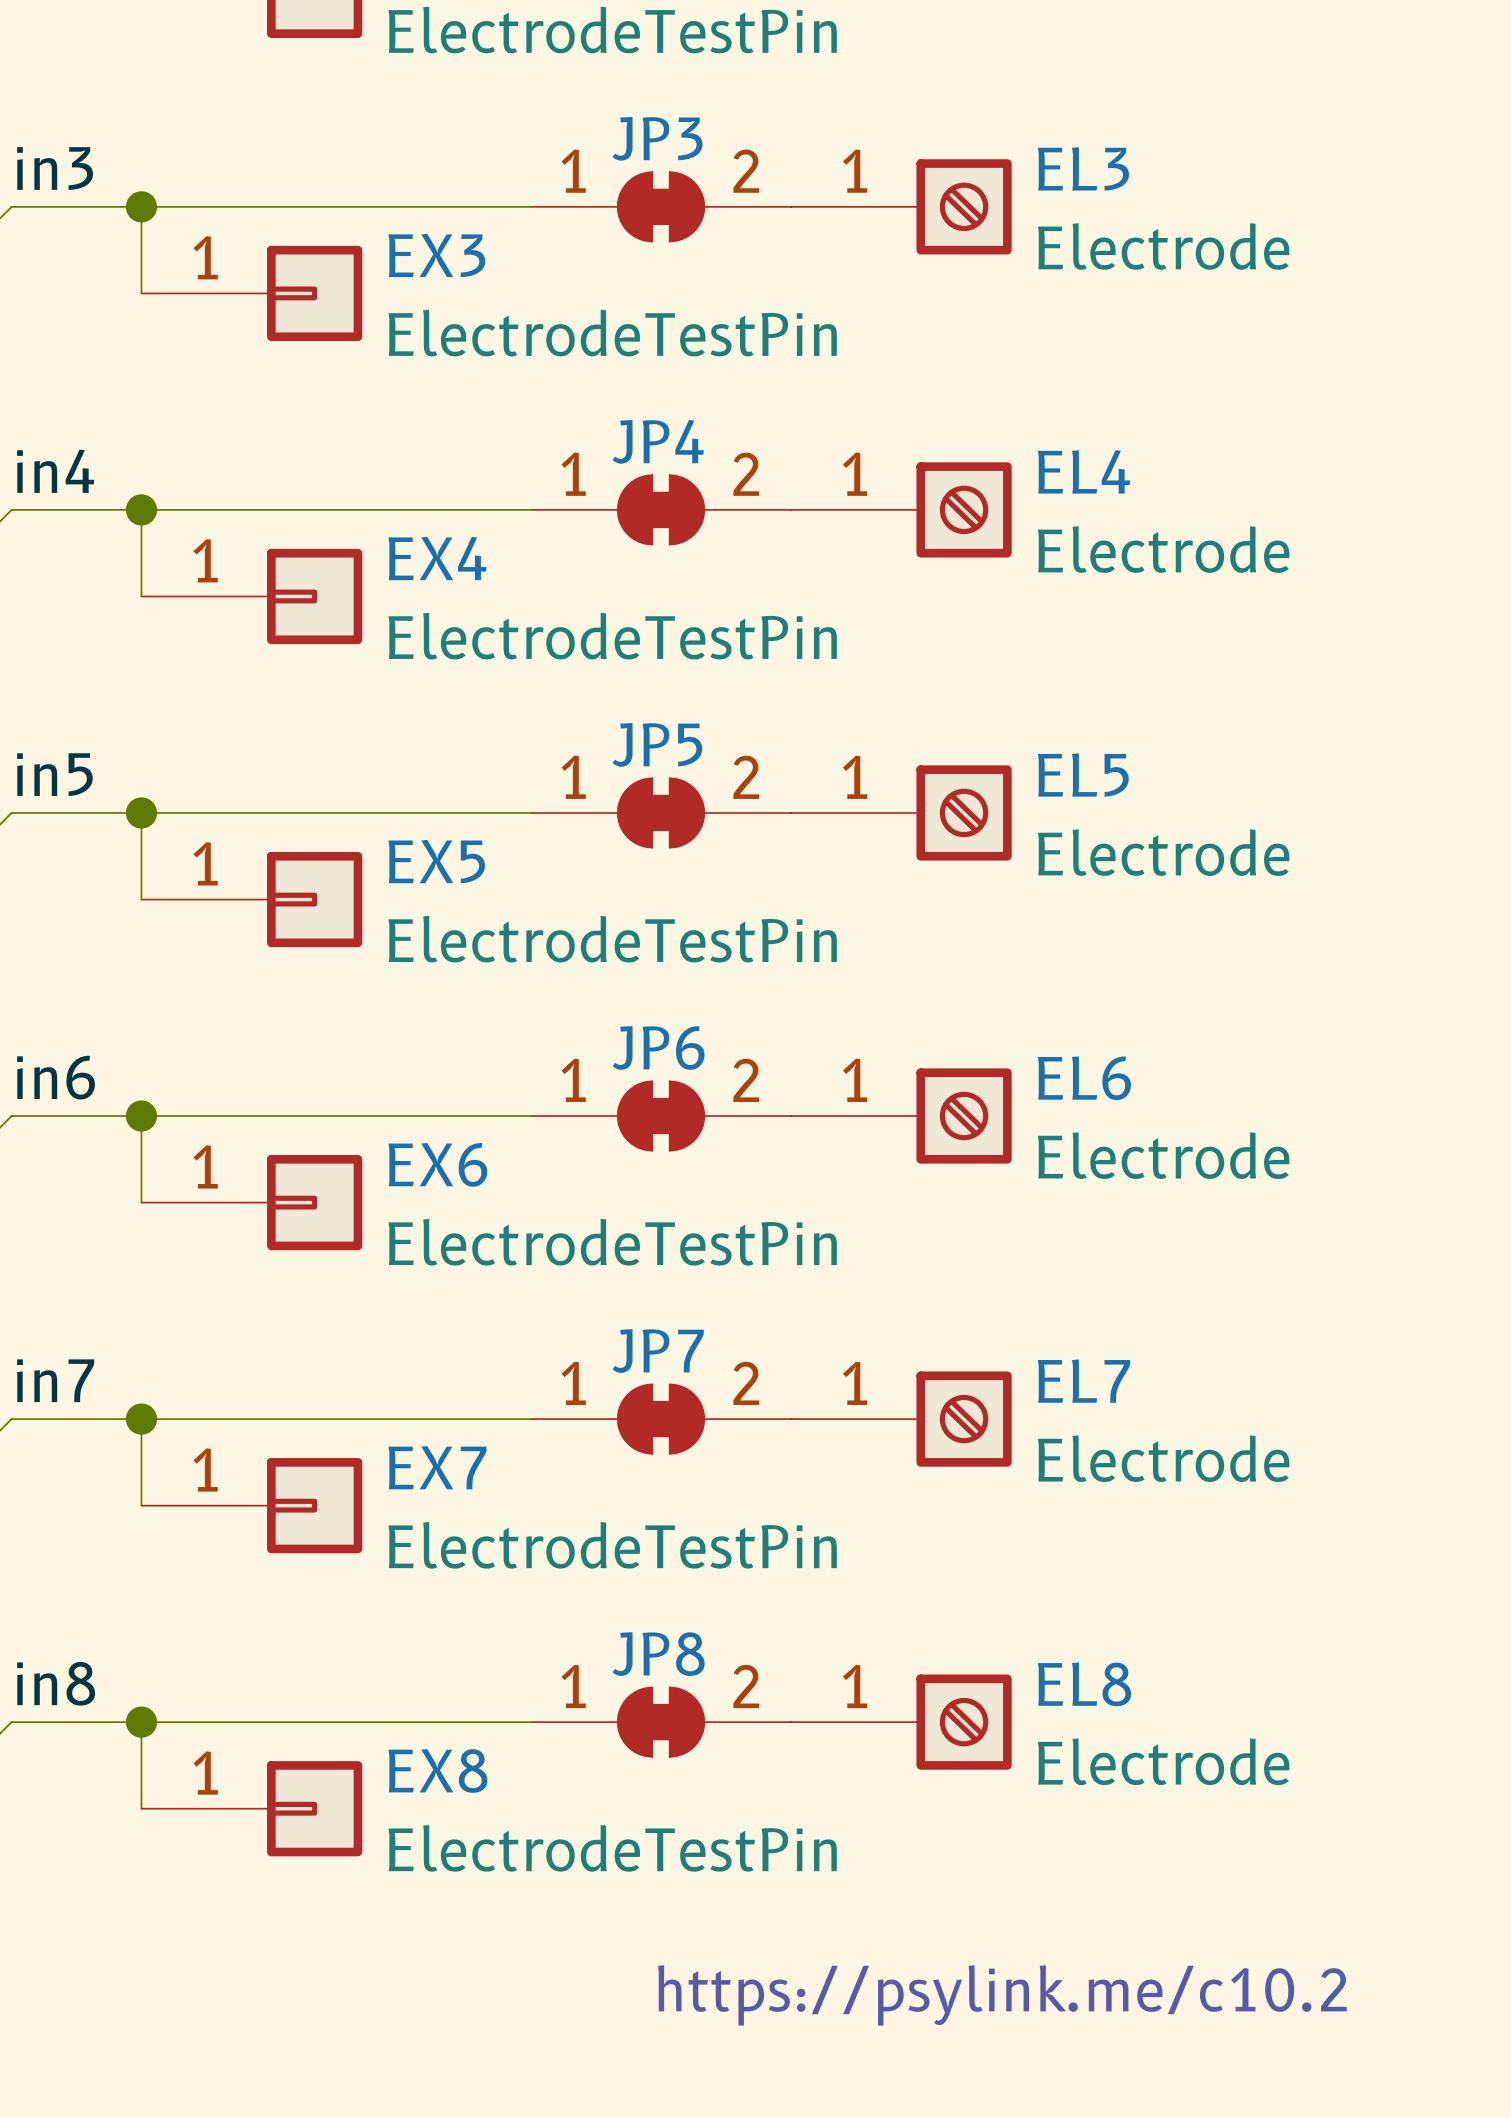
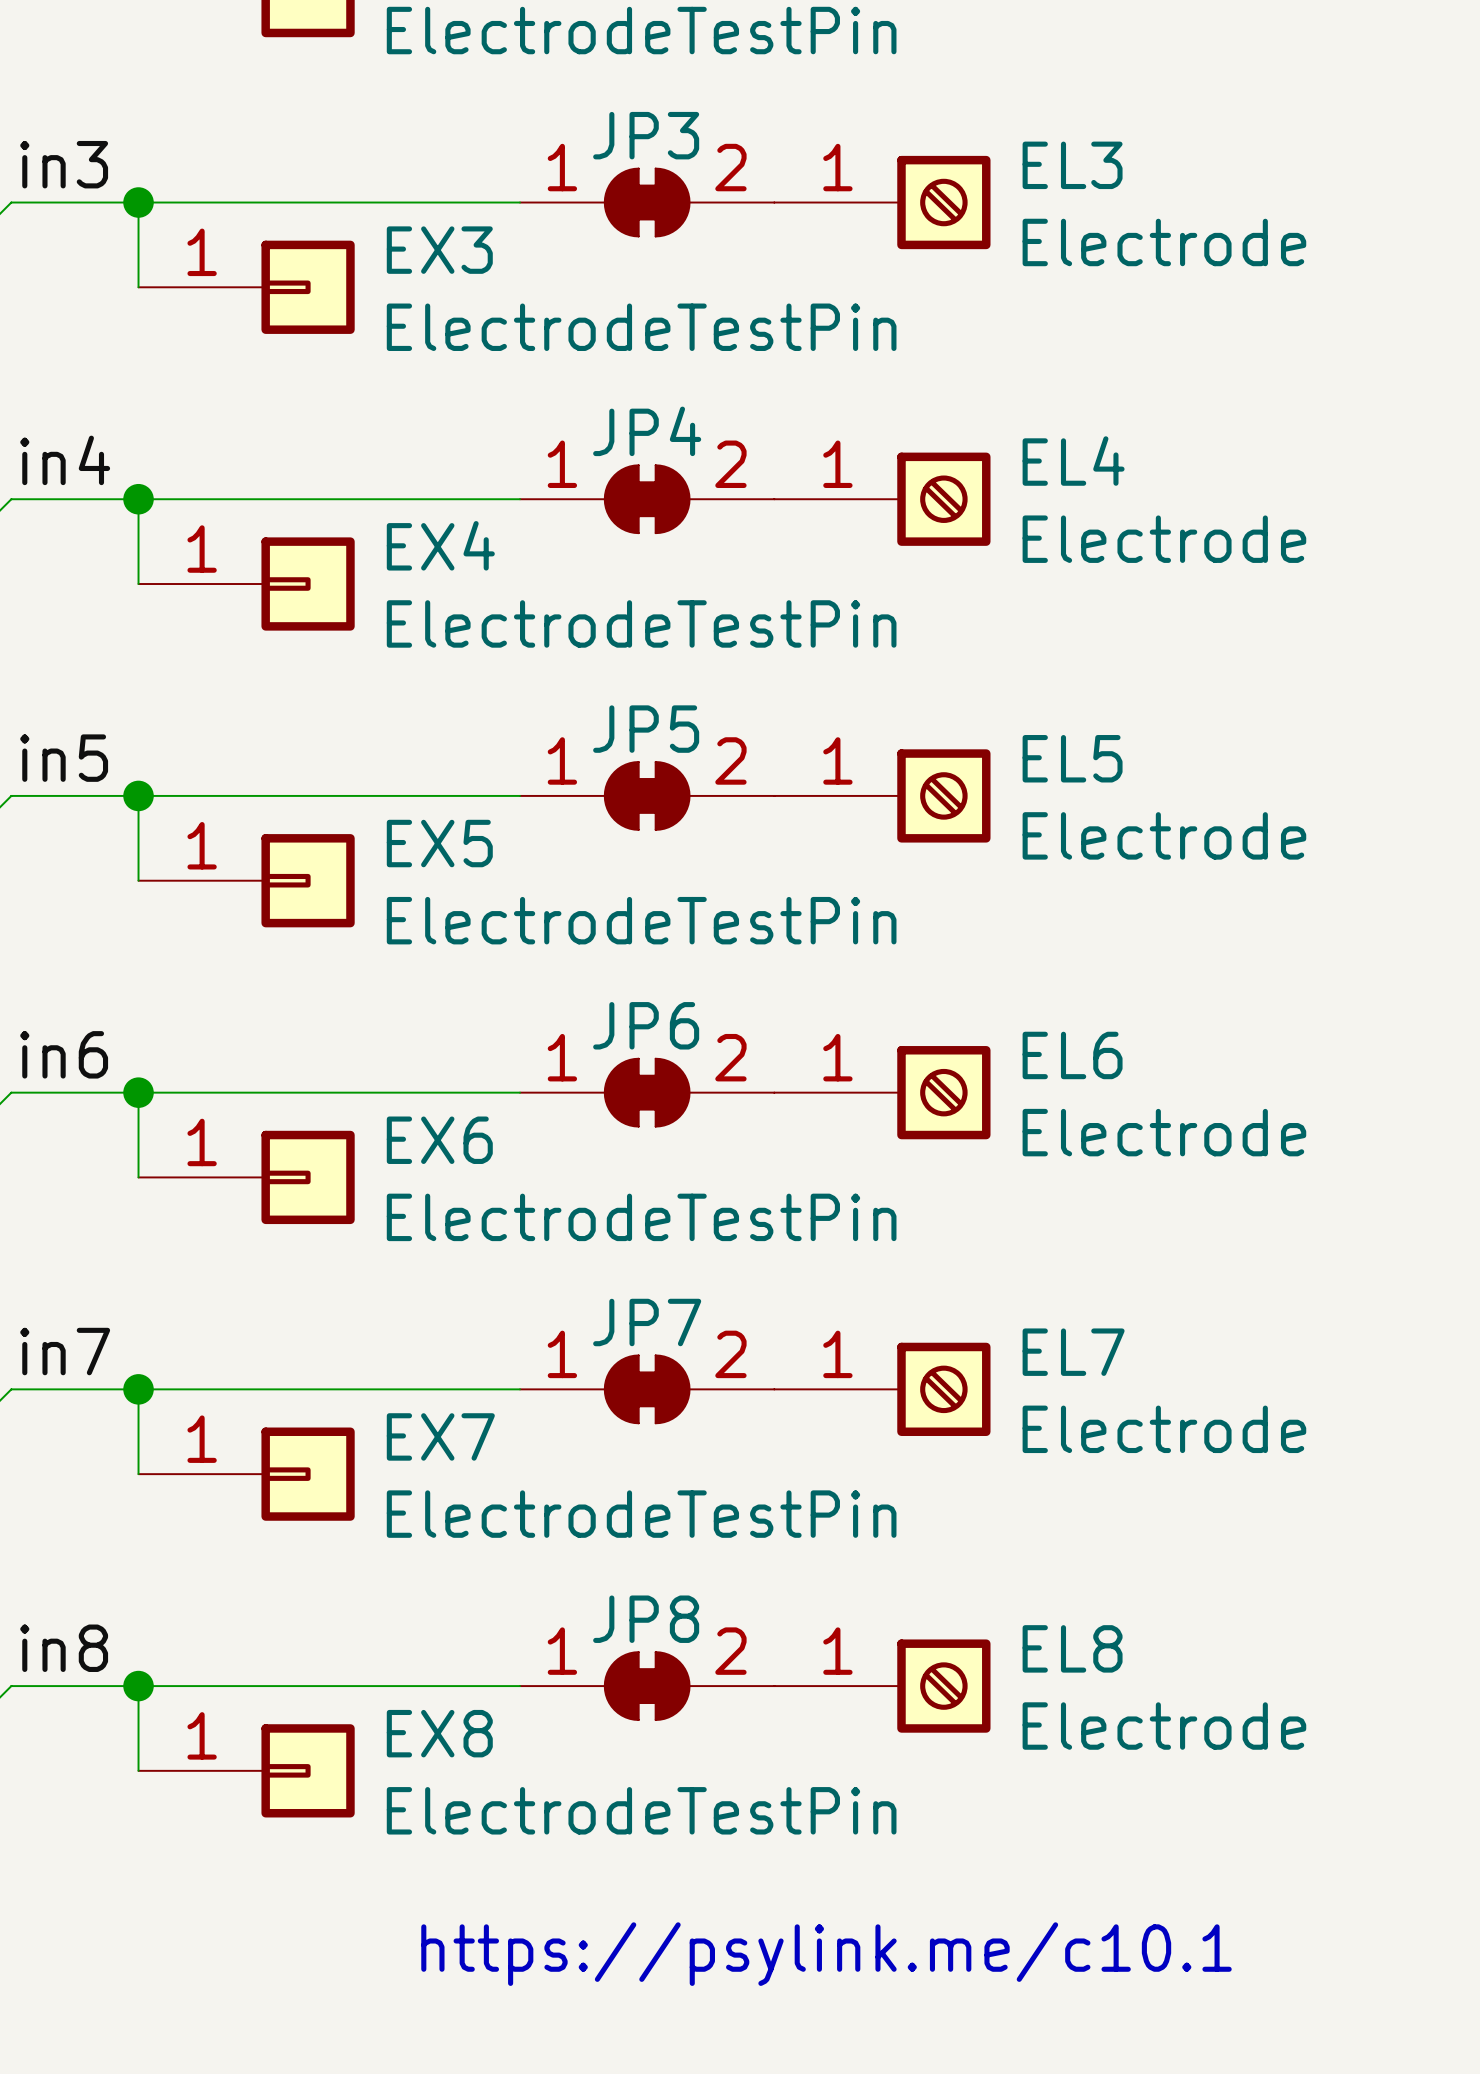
text: https://psylink.me/c10.2 (1002, 1995) -> https://psylink.me/c10.1 (826, 1954)

